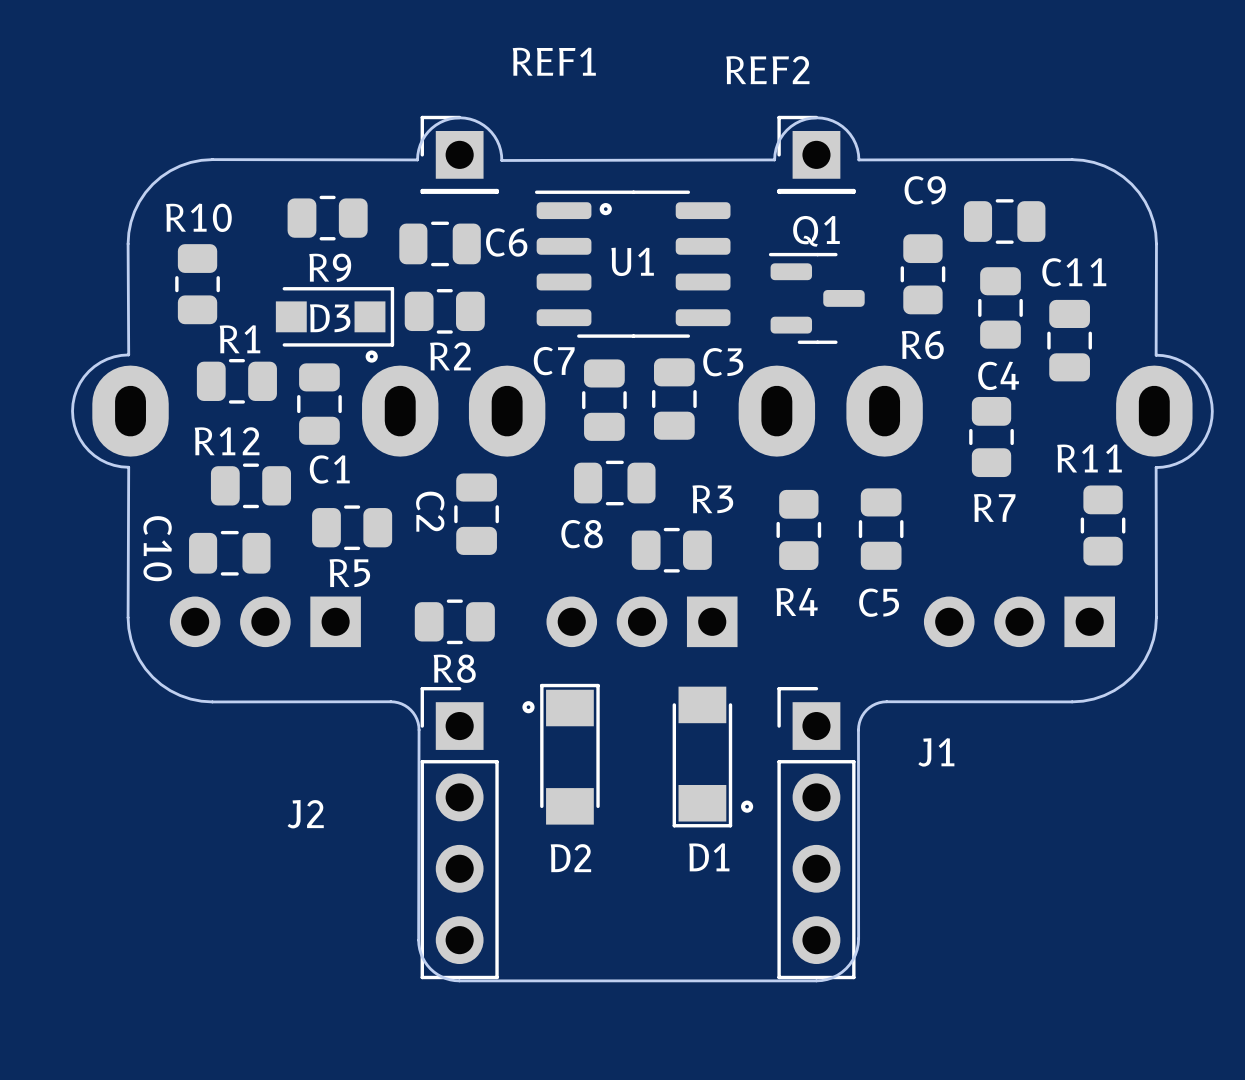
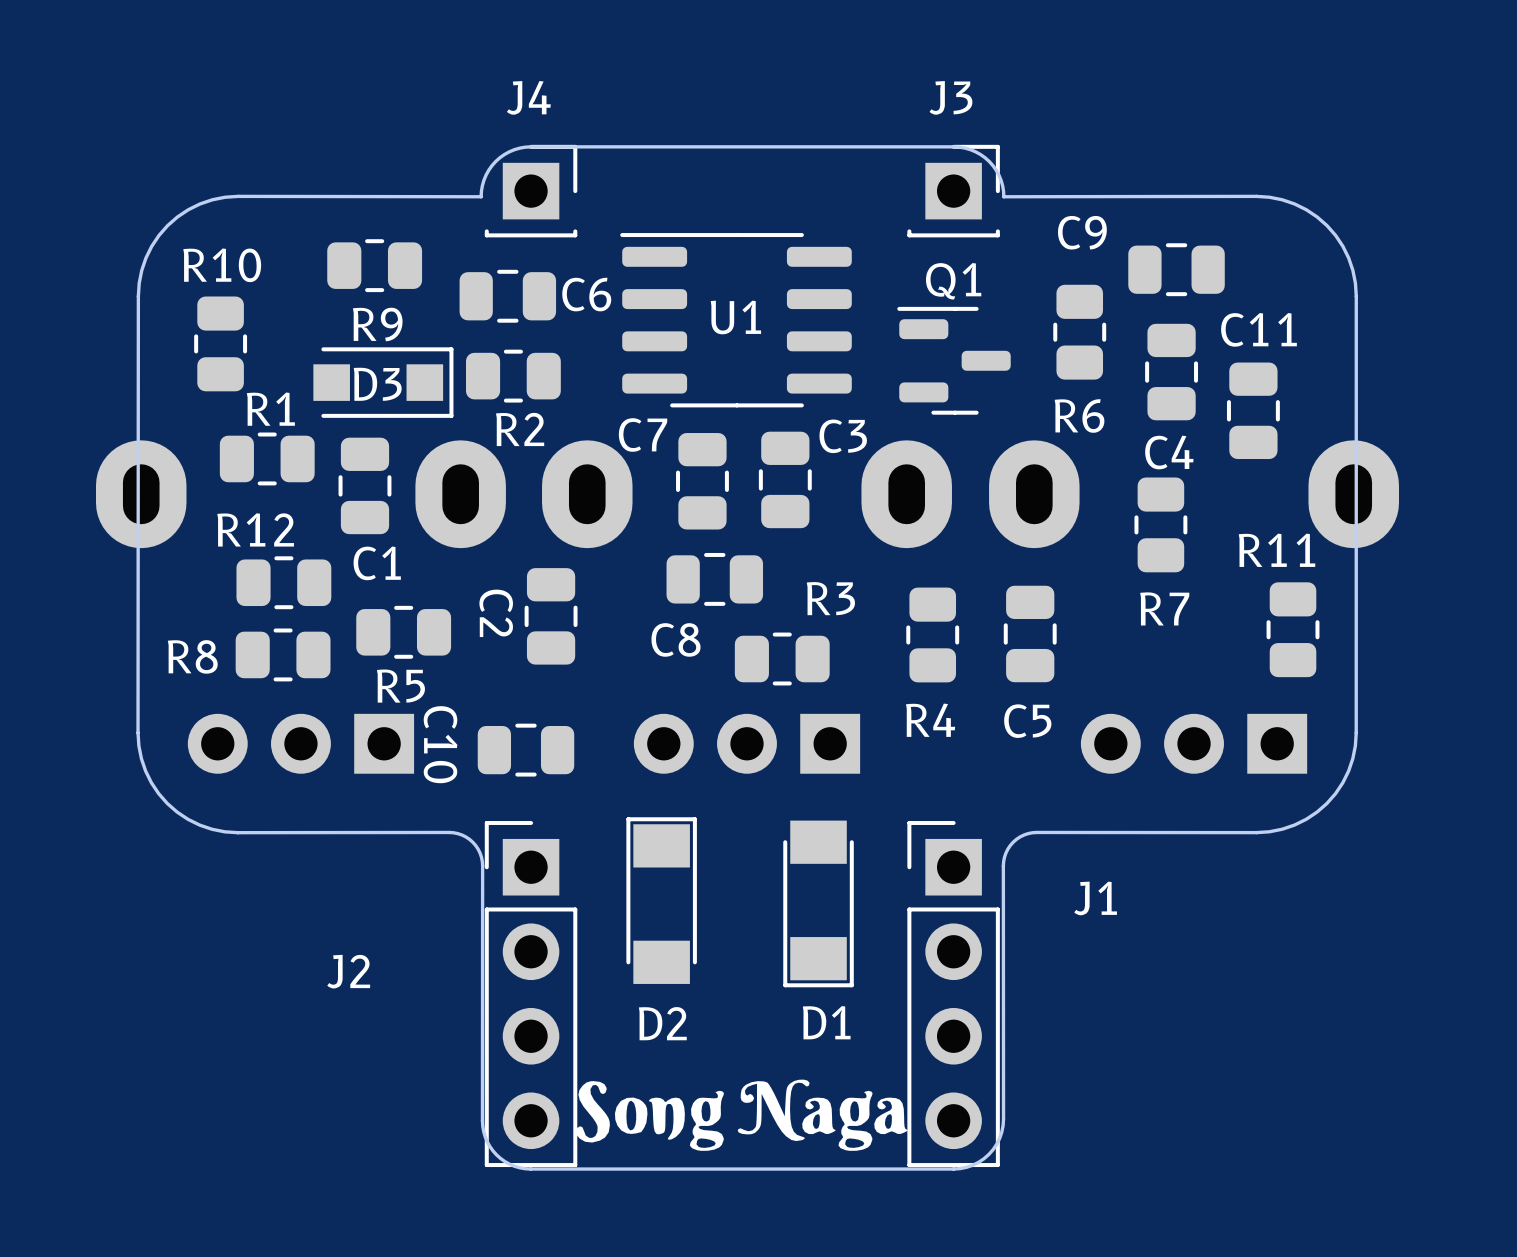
REF1: (459, 154) -> none
REF2: (816, 154) -> none
J4: none -> (531, 191)
J3: none -> (953, 191)
board edge: (858, 159) (855, 143) (846, 130) (832, 120) (816, 117) (800, 120) (786, 130) (777, 143) (774, 159) (501, 160) (499, 145) (491, 132) (479, 122) (459, 117) (444, 120) (428, 131) (420, 144) (417, 159) -> (1003, 196) (1001, 180) (989, 161) (970, 149) (953, 146) (525, 147) (509, 151) (495, 161) (486, 175) (481, 196)
drawing: [599, 203, 612, 216] -> none
board edge: (128, 243) (128, 354) (107, 359) (88, 371) (76, 389) (72, 411) (76, 432) (88, 450) (107, 463) (128, 467) (128, 617) (134, 649) (152, 677) (170, 690) (190, 699) (212, 701) (390, 701) (401, 703) (410, 710) (416, 719) (419, 729) (418, 940) -> (138, 296) (138, 732) (141, 758) (145, 771) (158, 793) (177, 812) (187, 819) (212, 829) (237, 832) (449, 832) (461, 835) (472, 842) (480, 853) (482, 865) (482, 1120)
board edge: (1156, 243) (1156, 355) (1169, 356) (1182, 361) (1198, 374) (1208, 391) (1212, 411) (1208, 431) (1198, 448) (1188, 457) (1176, 463) (1156, 467) (1156, 617) (1150, 649) (1139, 668) (1123, 684) (1093, 699) (1072, 701) (886, 701) (875, 703) (866, 710) (860, 719) (858, 729) (858, 938) -> (1356, 296) (1356, 732) (1352, 758) (1348, 771) (1335, 793) (1317, 812) (1306, 819) (1282, 829) (1256, 832) (1036, 832) (1024, 835) (1013, 842) (1005, 853) (1003, 865) (1003, 1119)
drawing: [365, 350, 378, 363] -> none
C10 position: (229, 553) -> (525, 750)
R8 position: (454, 621) -> (283, 654)
R8 name position: R8 (454, 668) -> R8 (192, 656)
drawing: [522, 701, 535, 714] -> none
drawing: [741, 800, 754, 813] -> none
drawing: none -> [575, 1079, 908, 1151]

